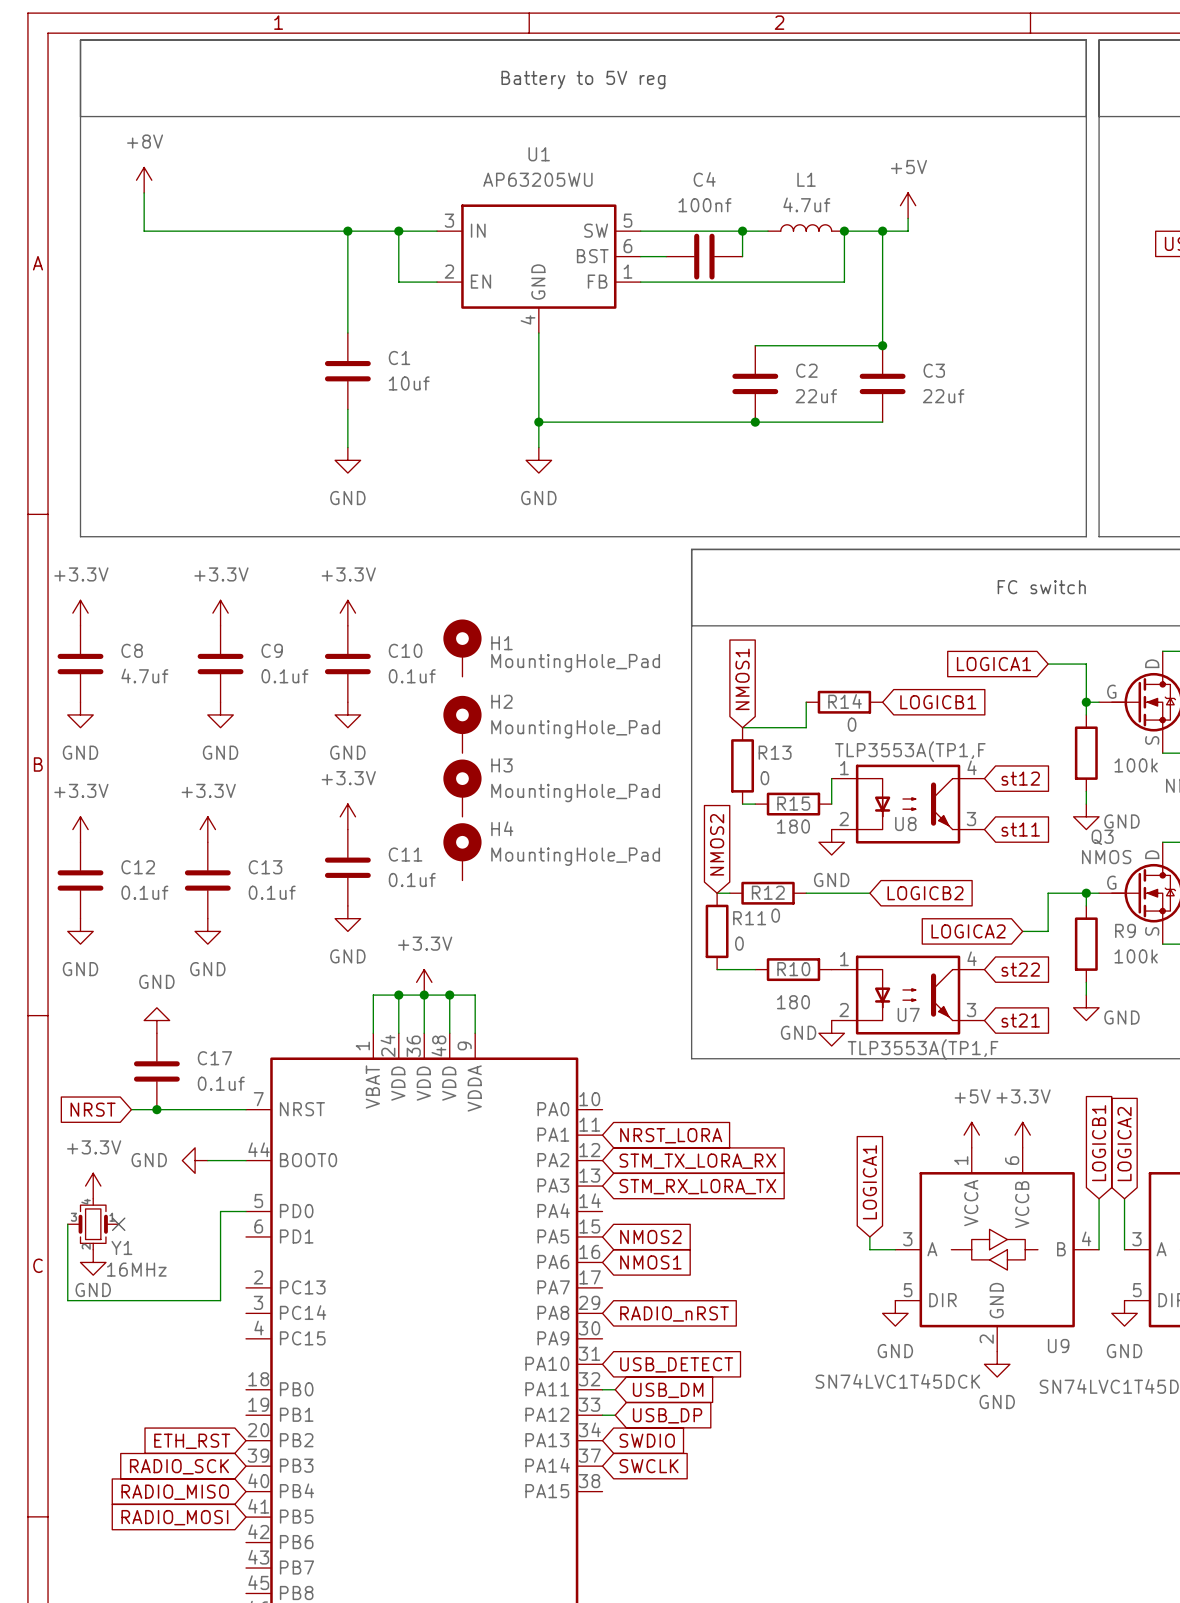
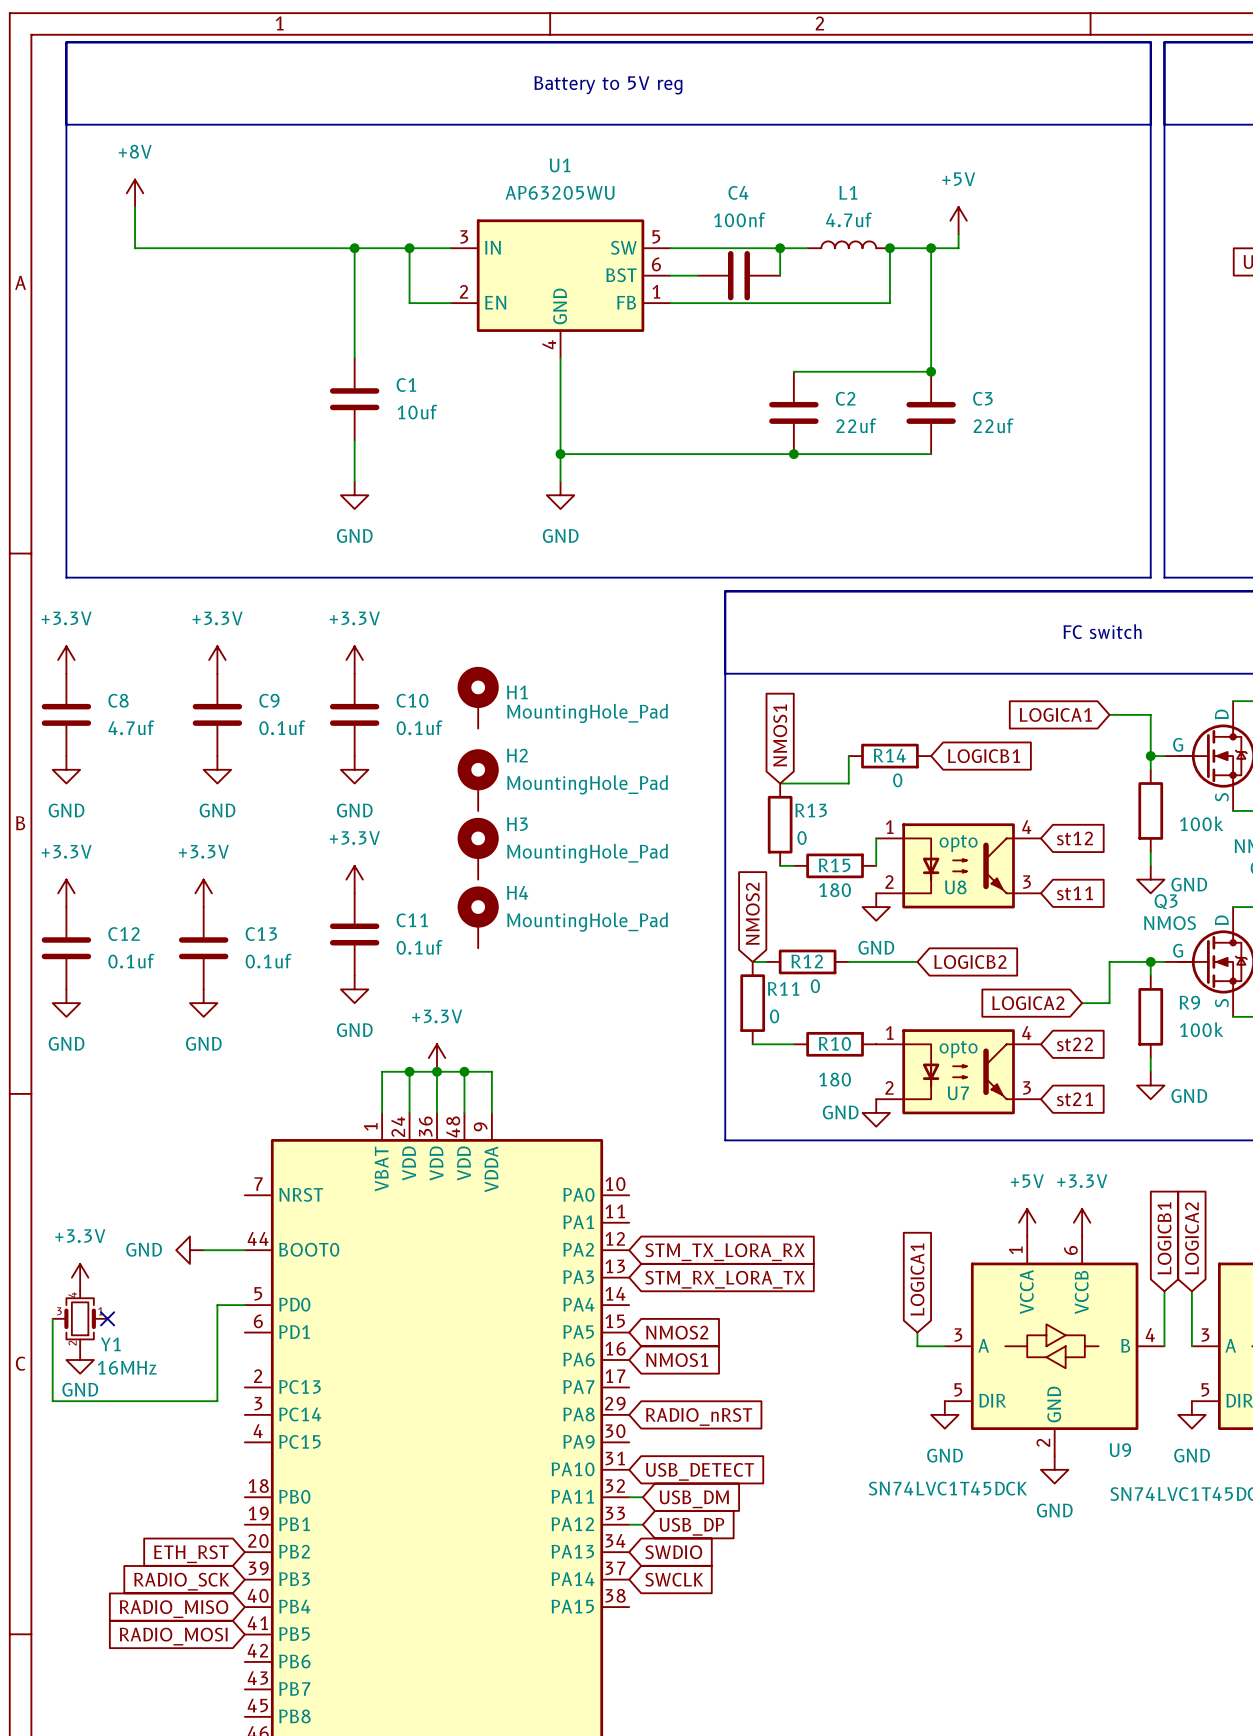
U8 value: TLP3553A(TP1,F (910, 751) -> opto (958, 843)
power symbol: GND (156, 1020) -> none
U7 value: TLP3553A(TP1,F (923, 1049) -> opto (958, 1049)
C17: 0.1uf (156, 1071) -> none
global label: NRST (93, 1109) -> none
wire: (131, 1109) (246, 1109) -> none
junction: (156, 1109) -> none
global label: NRST_LORA (671, 1135) -> none

